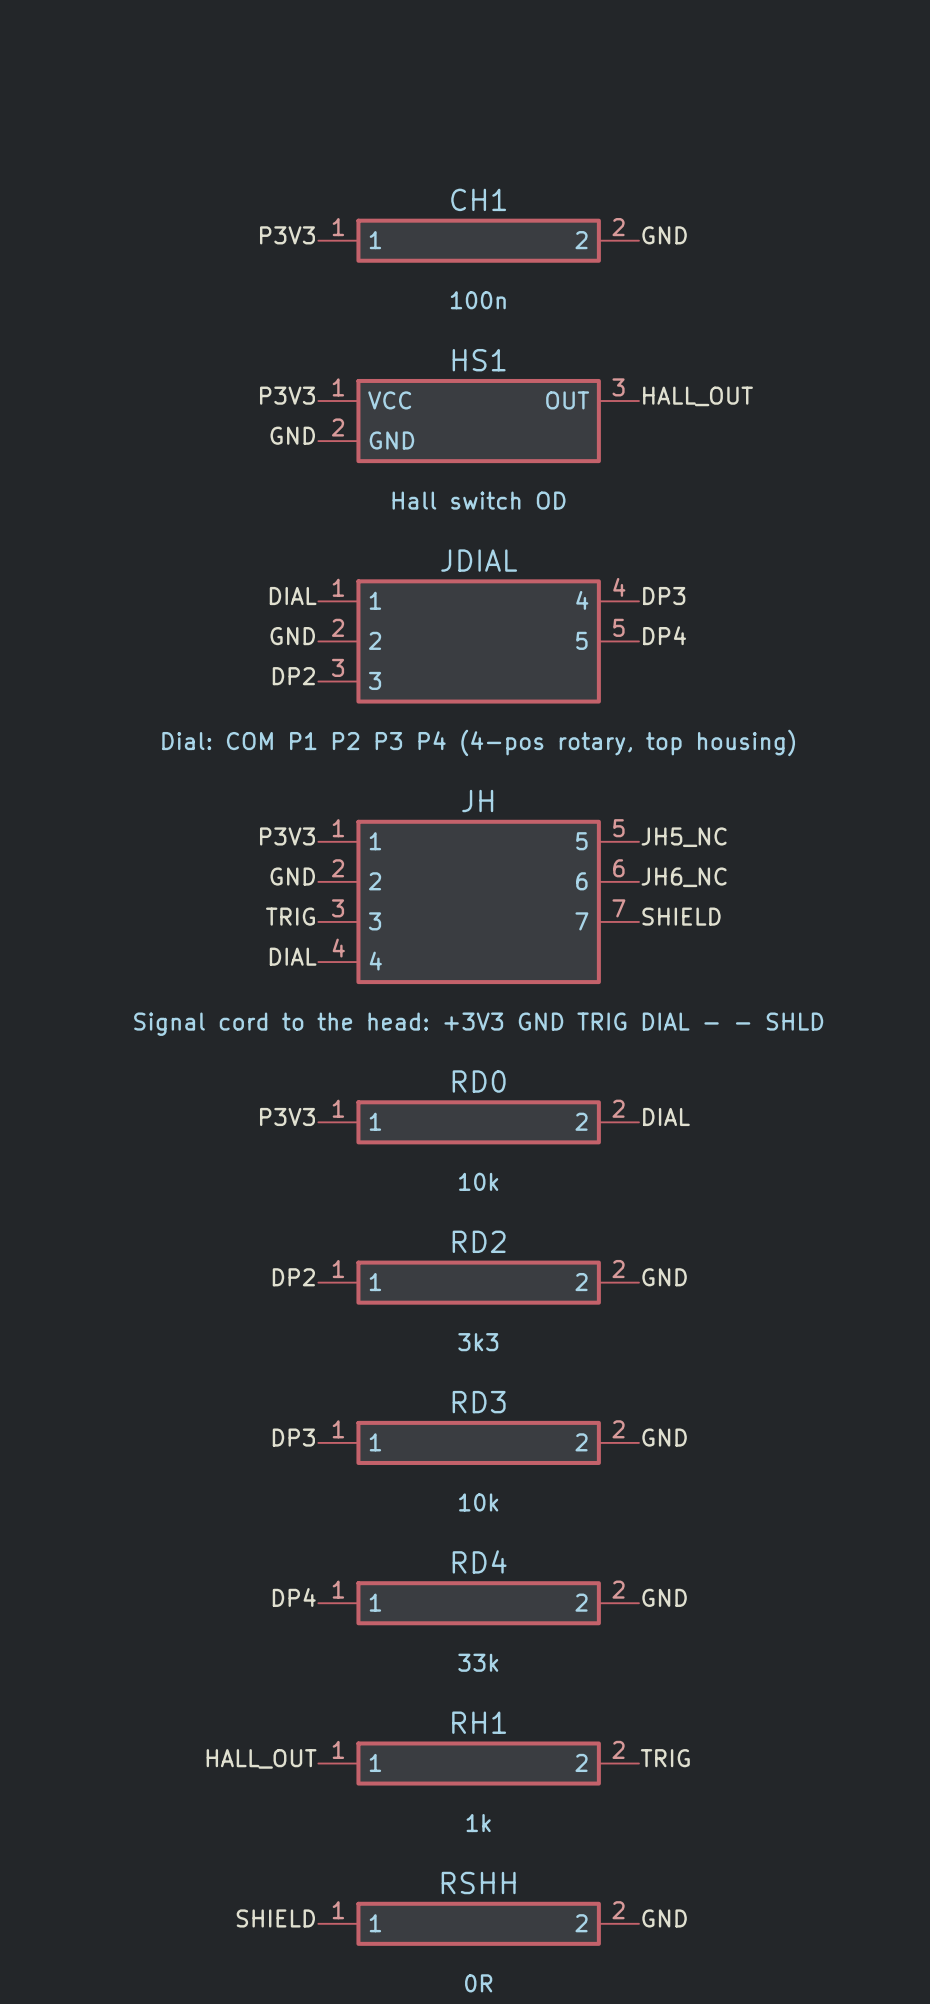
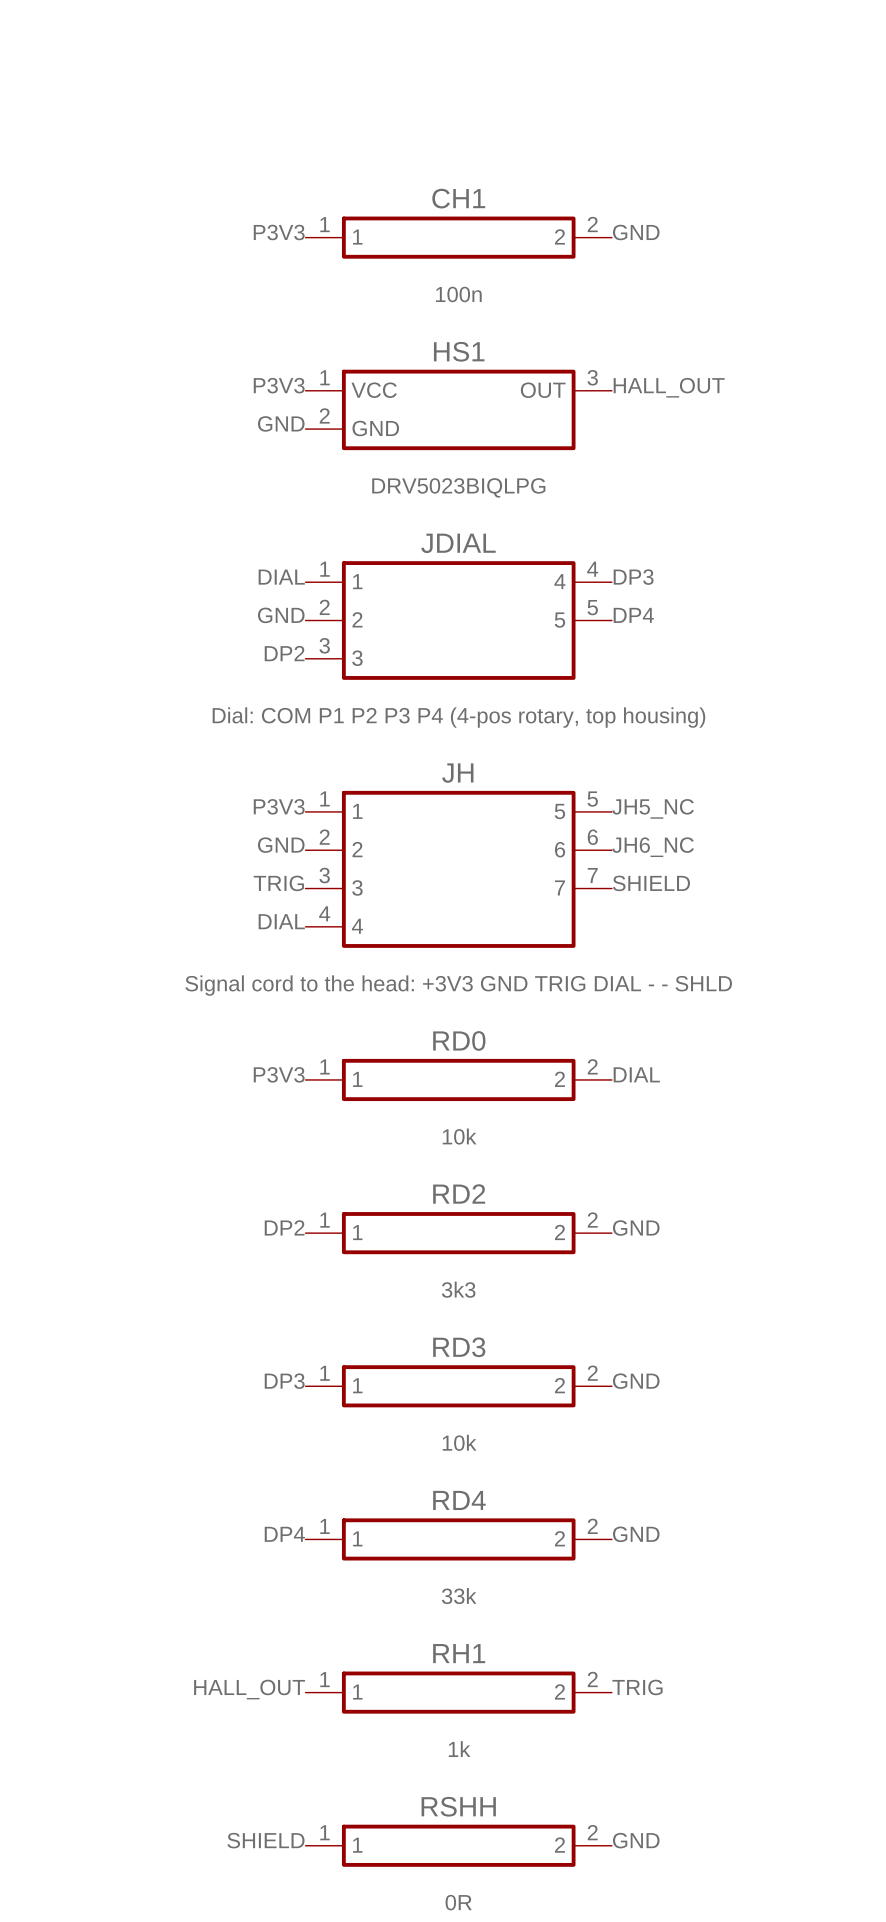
HS1 value: Hall switch OD (479, 500) -> DRV5023BIQLPG (458, 487)

